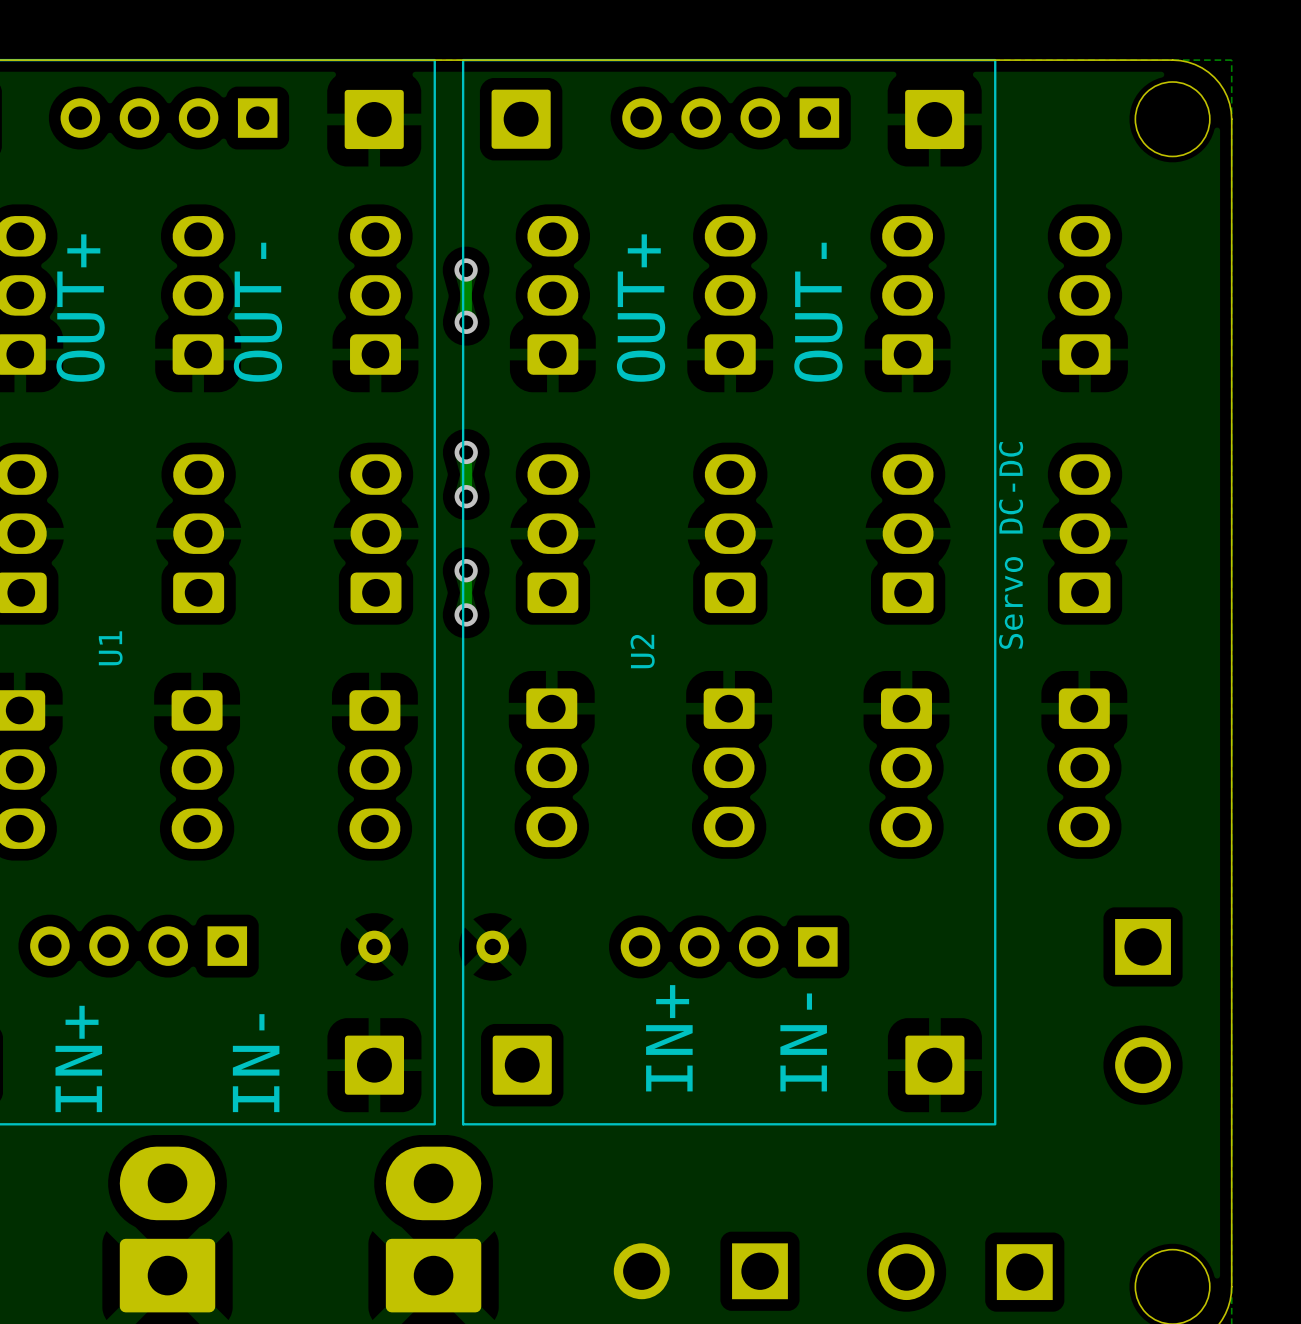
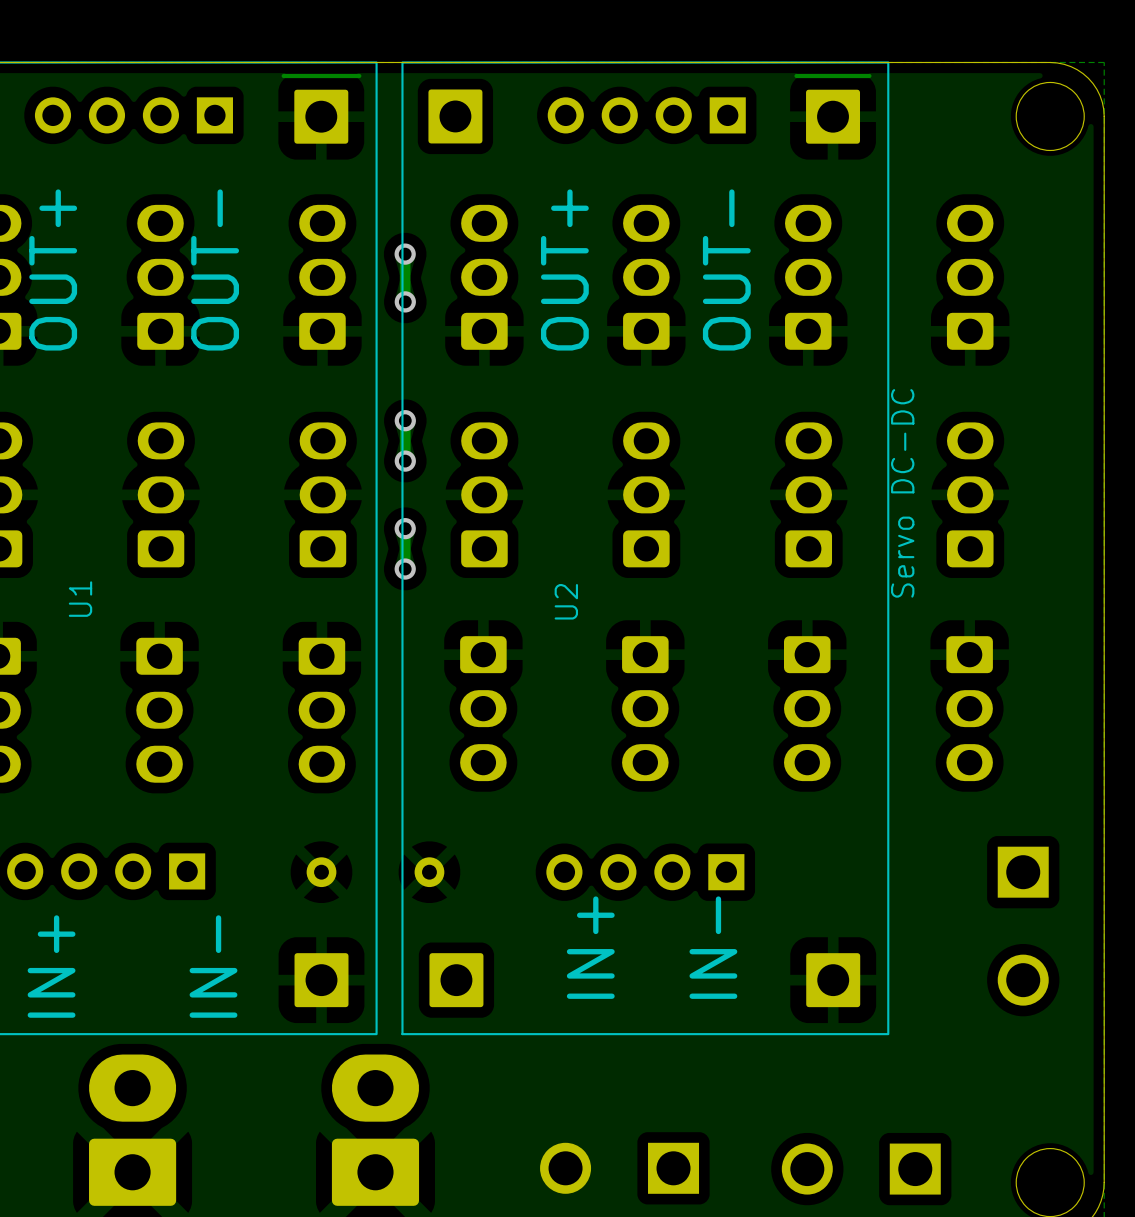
track: none -> (359, 75) (283, 75)
track: none -> (869, 75) (796, 75)

